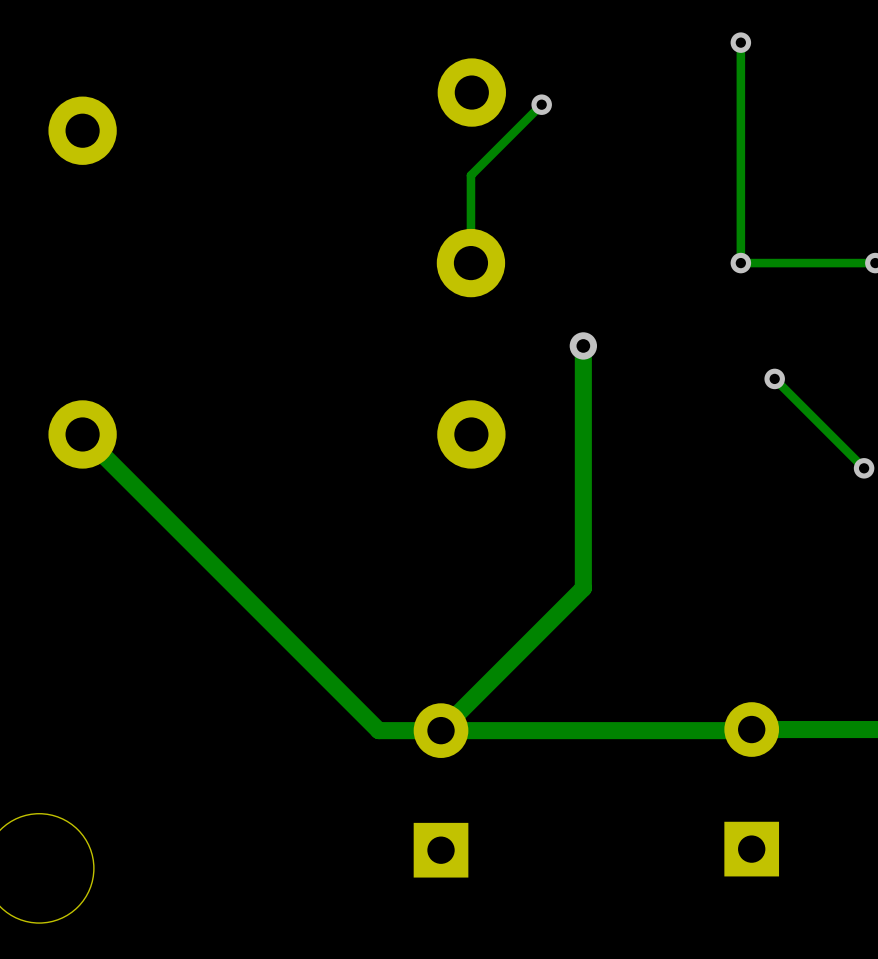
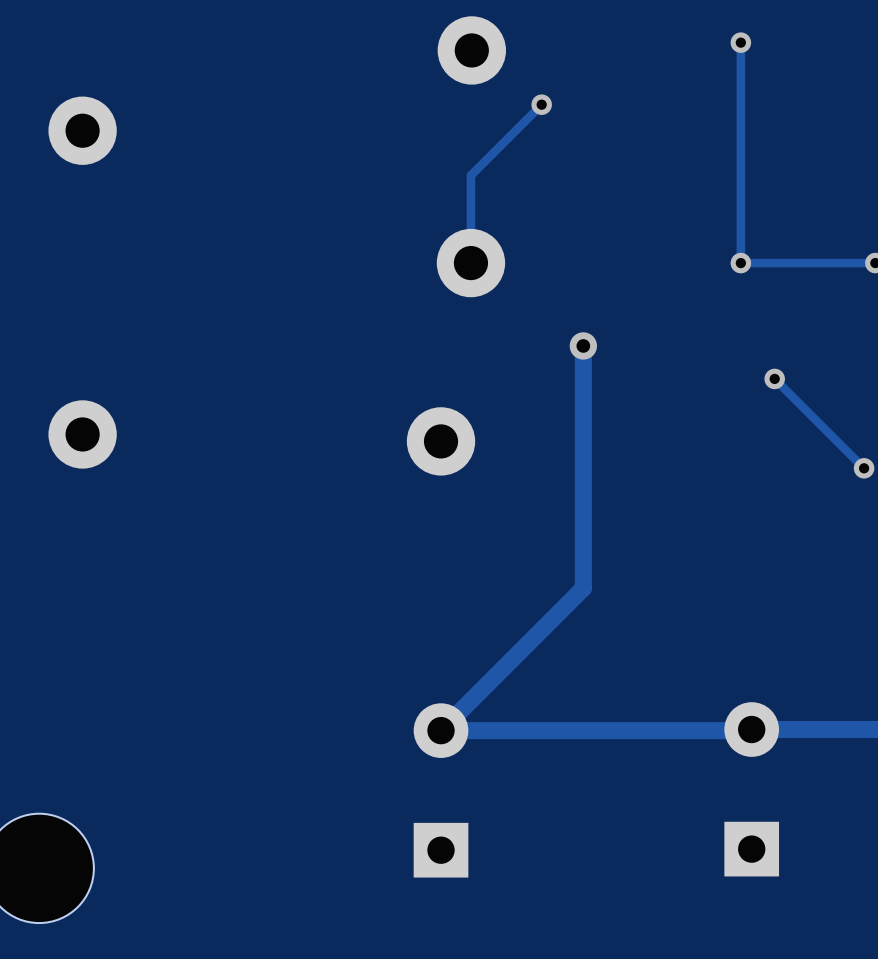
part position: (471, 92) -> (471, 50)
track: (82, 434) (378, 730) (441, 730) -> none
part position: (471, 434) -> (441, 441)

